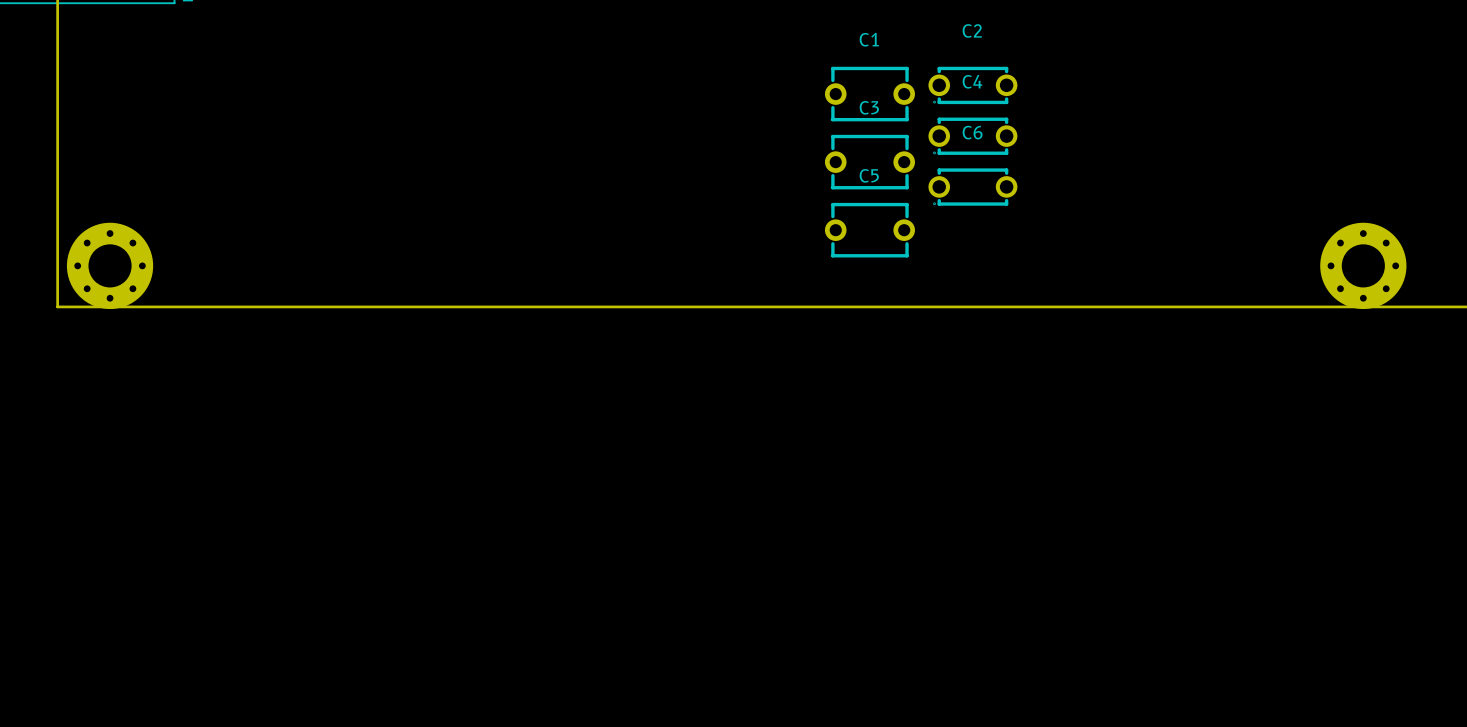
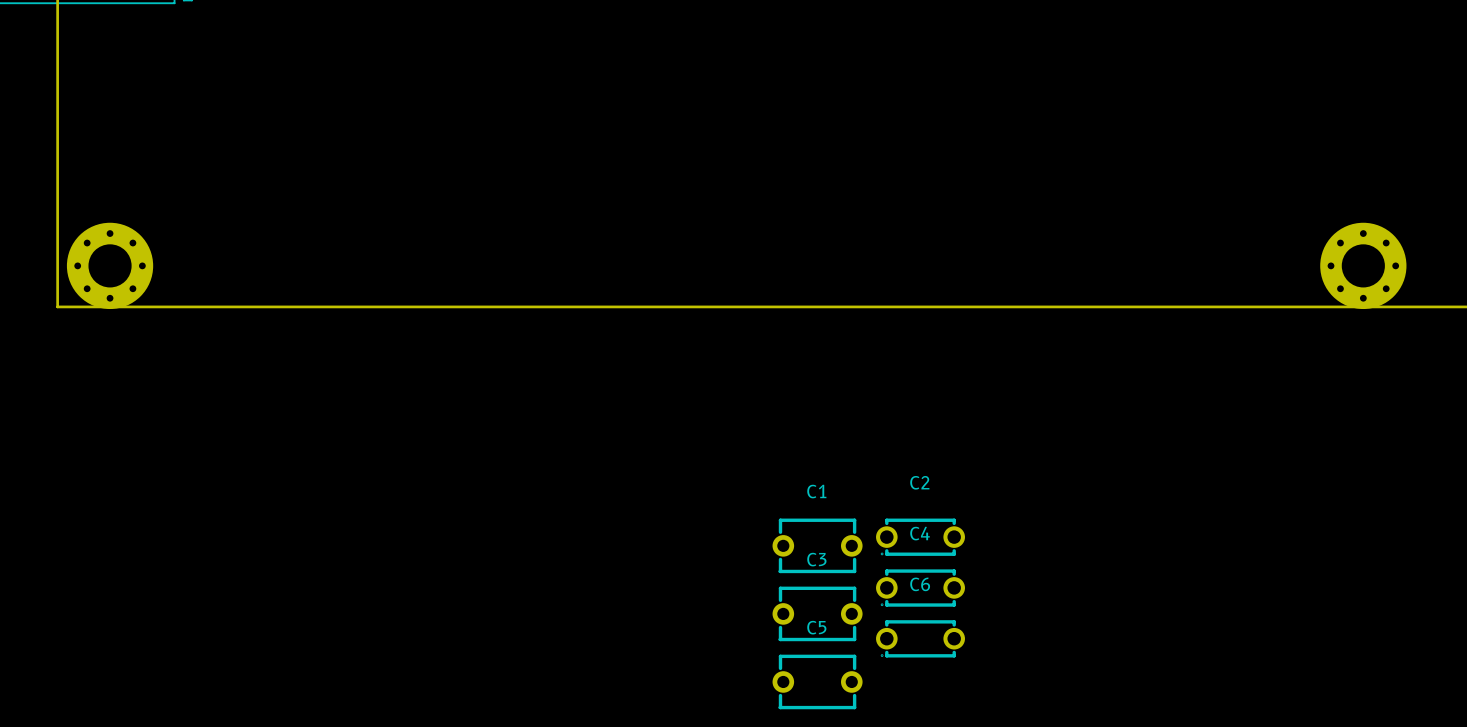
C2 position: (972, 85) -> (920, 537)
C1 position: (869, 94) -> (817, 545)
C4 position: (972, 136) -> (920, 588)
C3 position: (869, 162) -> (817, 613)
C6 position: (972, 187) -> (920, 638)
C5 position: (869, 230) -> (817, 681)

